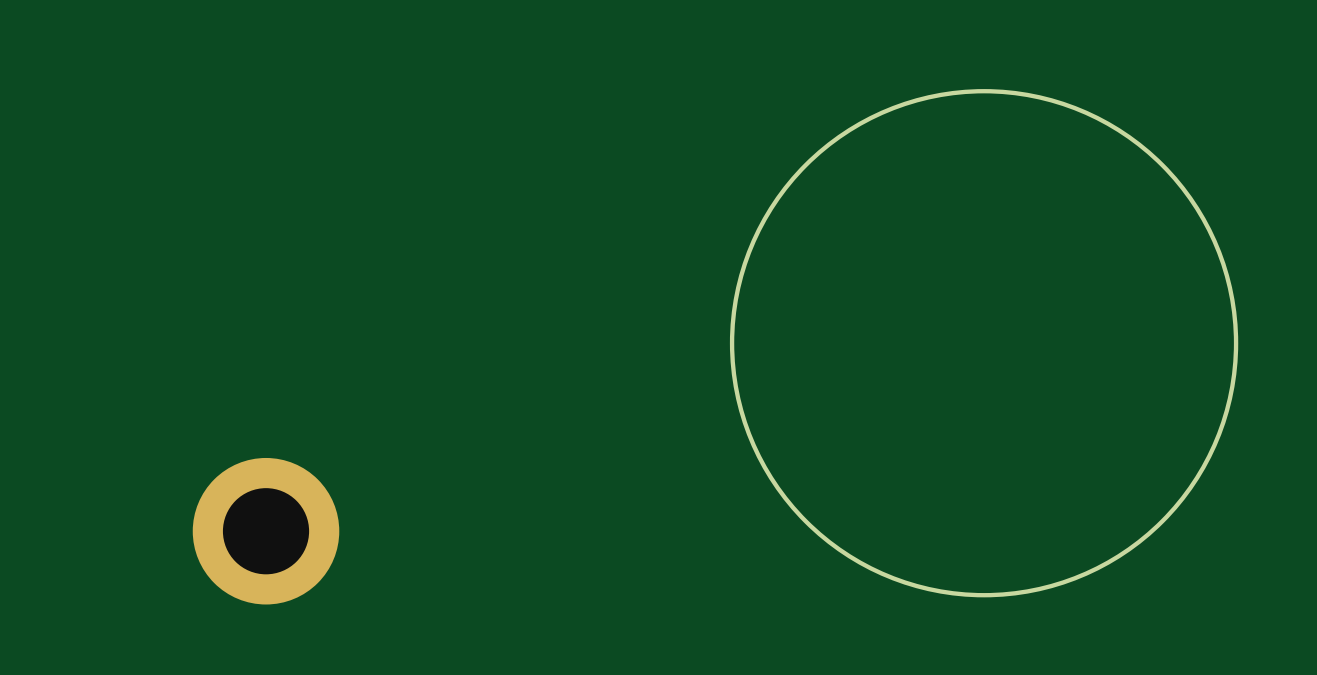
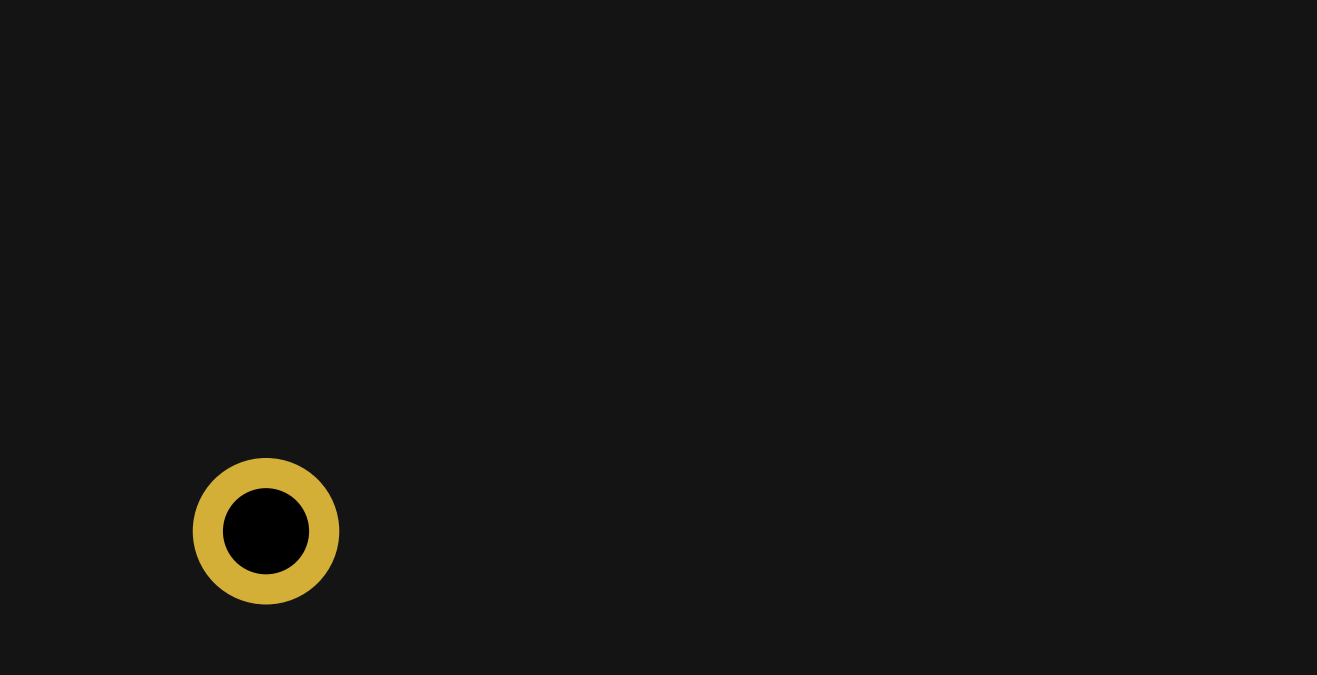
round board edge: [729, 89, 1239, 598] -> none

